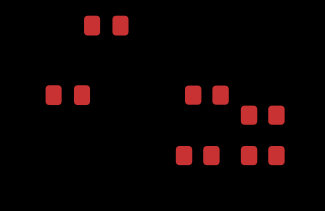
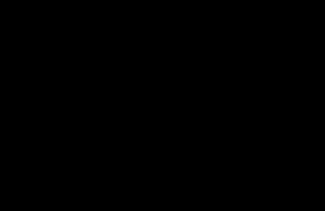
part: (106, 25) -> none
part: (67, 95) -> none
part: (206, 95) -> none
part: (262, 115) -> none
part: (197, 155) -> none
part: (262, 155) -> none

